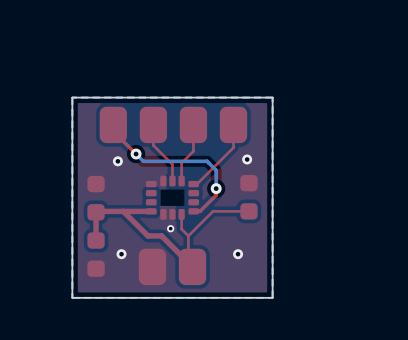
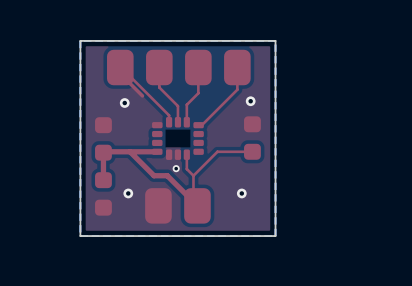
top track: none -> (120, 66) (169, 115) (169, 122)
bottom track: (136, 154) (143, 161) (207, 161) (216, 170) (216, 188) -> none
via: (136, 154) -> none
top track: (216, 188) (216, 195) (200, 211) (193, 211) -> none
via: (216, 188) -> none

